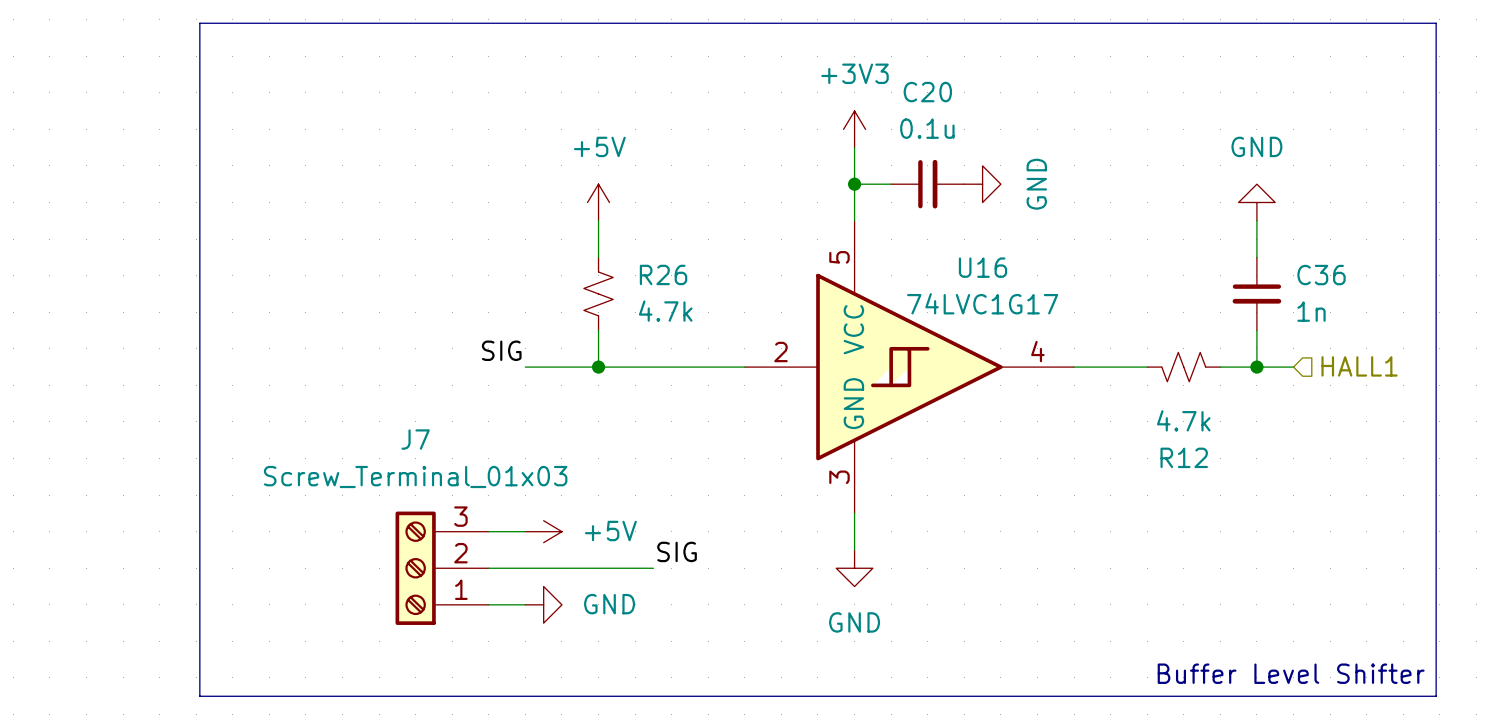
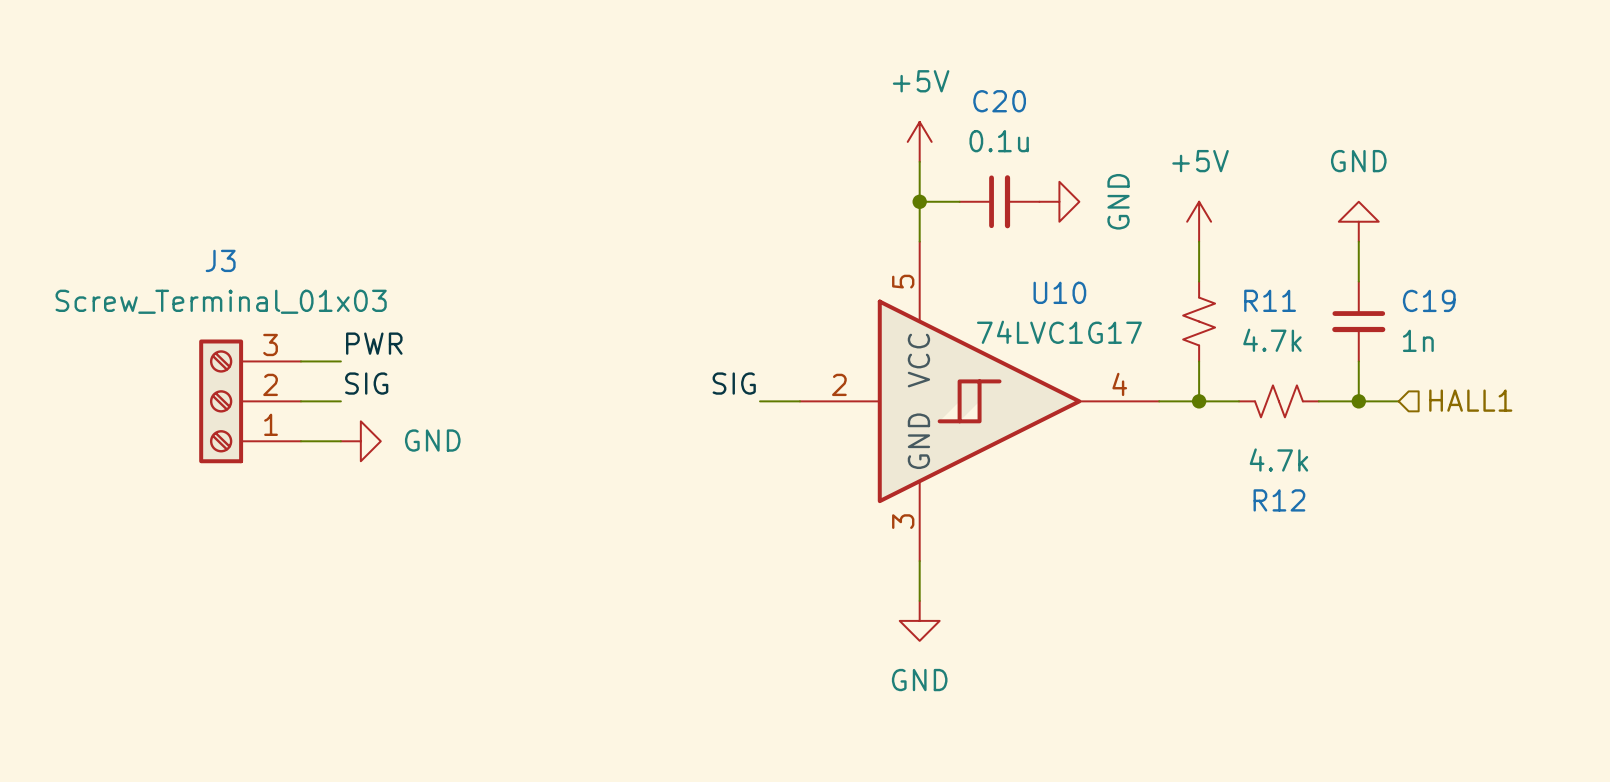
line: (199, 23) (1436, 23) (1436, 696) (199, 696) (199, 23) -> none
power symbol: +3V3 (854, 129) -> +5V (919, 141)
power symbol: +5V (598, 202) -> none
power symbol: none -> +5V (1199, 221)
wire: (598, 220) (598, 257) -> none
wire: none -> (1199, 241) (1199, 281)
U16 name: U16 (983, 267) -> U10 (1059, 292)
C36 name: C36 (1321, 275) -> C19 (1429, 300)
R26: 4.7k (598, 293) -> none
R11: none -> 4.7k (1199, 321)
label: none -> PWR (374, 343)
wire: (598, 330) (598, 367) -> none
wire: none -> (1199, 361) (1199, 401)
label: none -> SIG (366, 383)
label: SIG (501, 350) -> none
label: none -> SIG (734, 383)
J3: none -> Screw_Terminal_01x03 (250, 401)
wire: none -> (300, 401) (340, 401)
wire: (525, 367) (708, 367) -> none
junction: (598, 367) -> none
junction: none -> (1199, 401)
wire: (488, 531) (525, 531) -> (300, 361) (340, 361)
power symbol: +5V (543, 531) -> none
label: SIG (677, 551) -> none
J7: Screw_Terminal_01x03 (442, 568) -> none
wire: (488, 568) (653, 568) -> none
wire: (488, 604) (525, 604) -> (300, 441) (340, 441)
power symbol position: GND (543, 604) -> GND (360, 441)
text: Buffer Level Shifter (1291, 673) -> none

